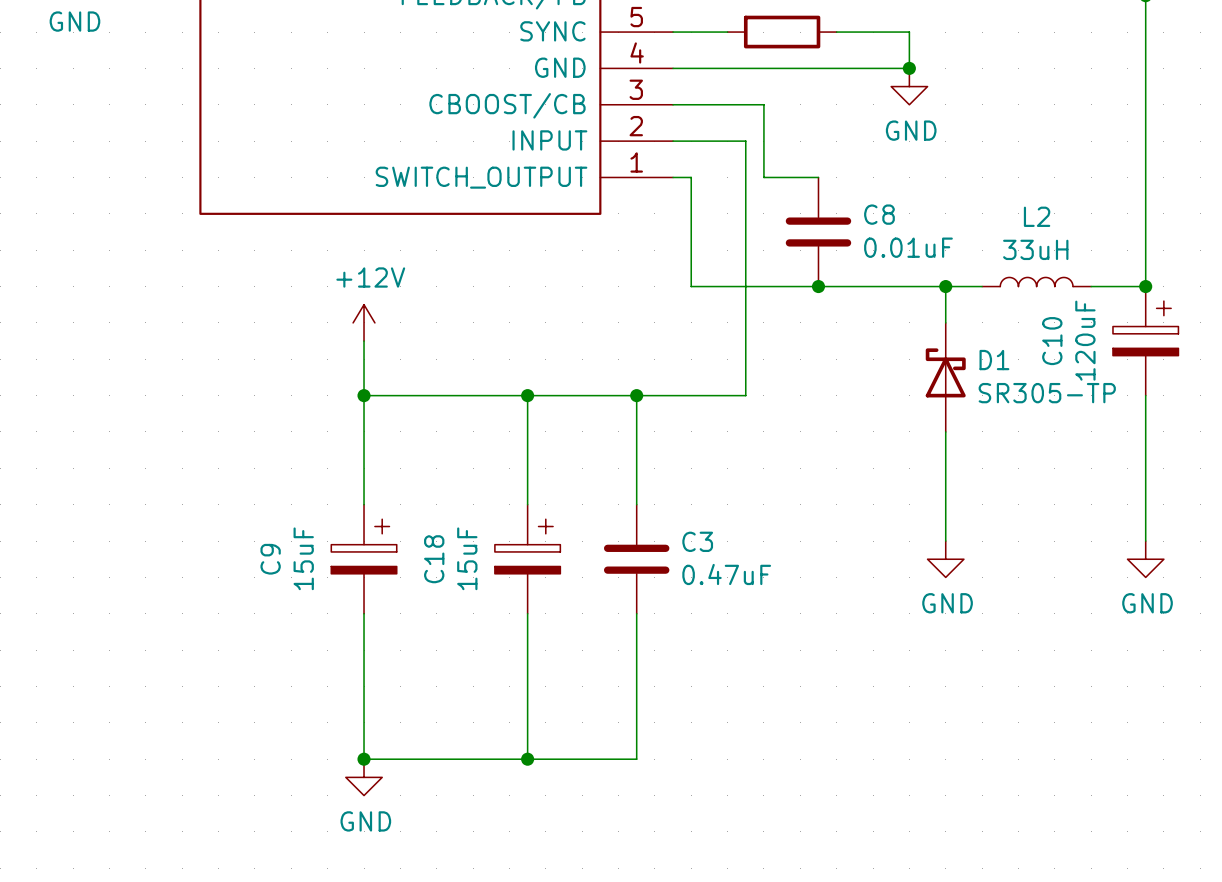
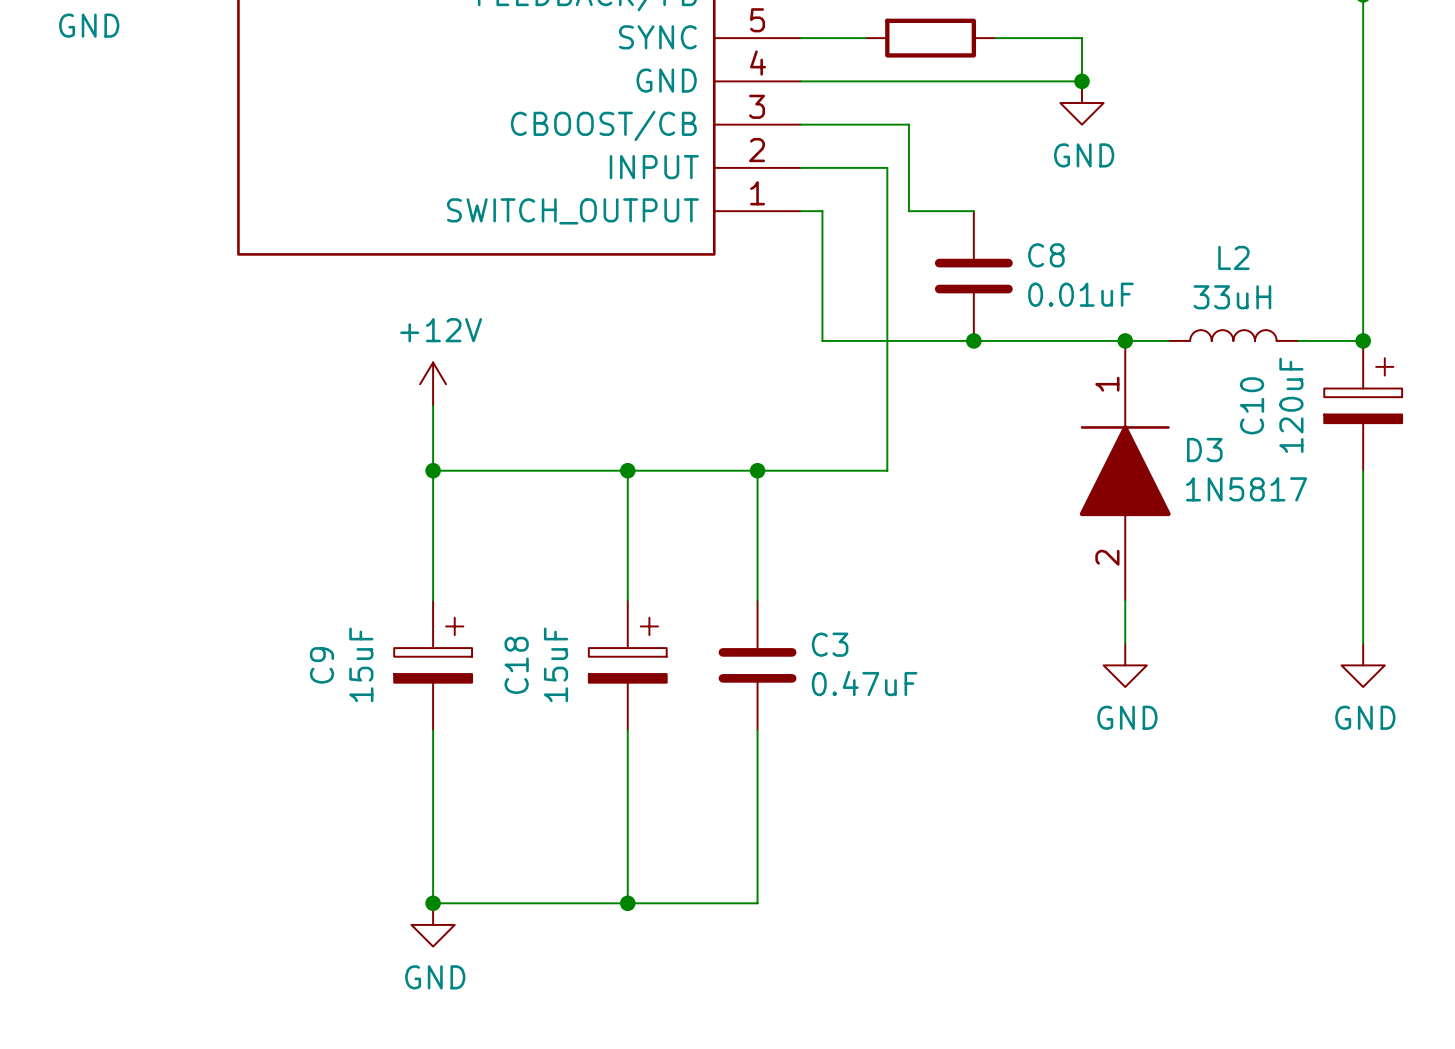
D1: SR305-TP (945, 377) -> none
D3: none -> 1N5817 (1125, 470)

